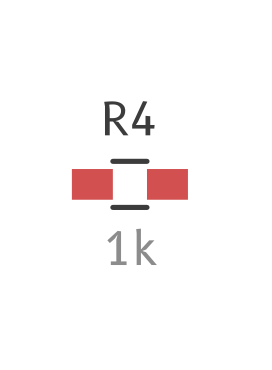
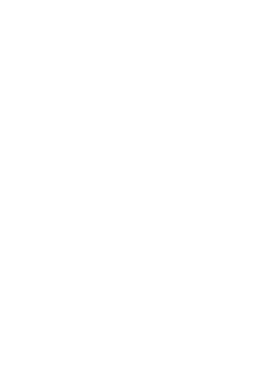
R4: 1k (129, 184) -> none

